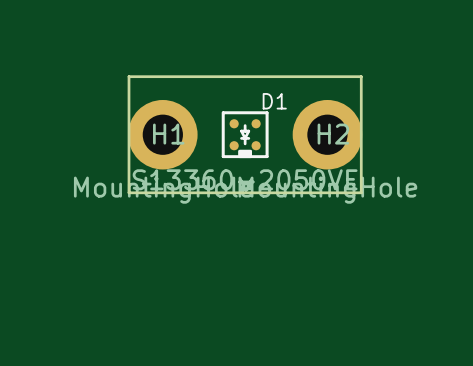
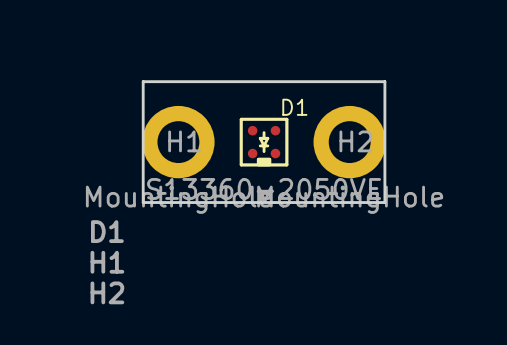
text: none -> D1 (107, 231)
text: none -> H1 (107, 262)
text: none -> H2 (107, 292)

